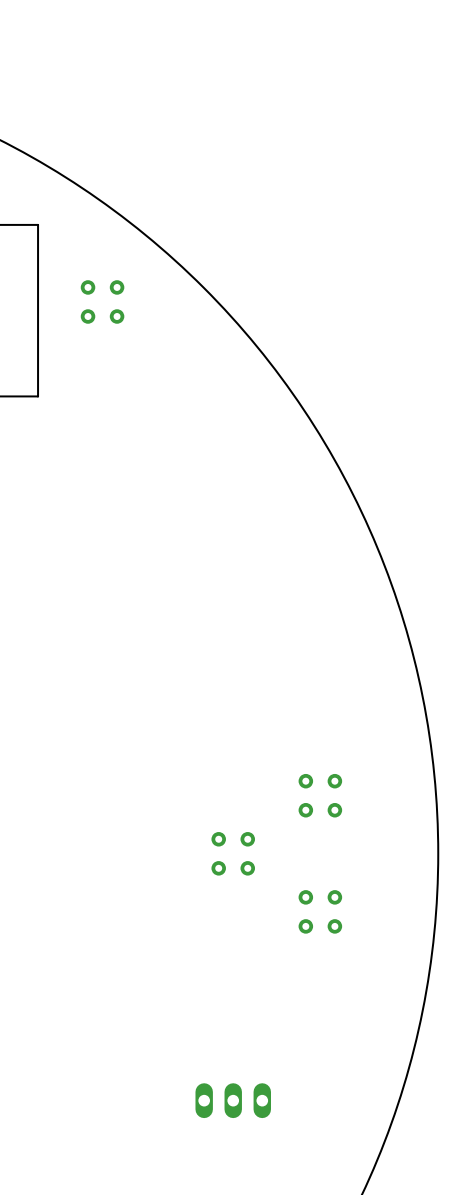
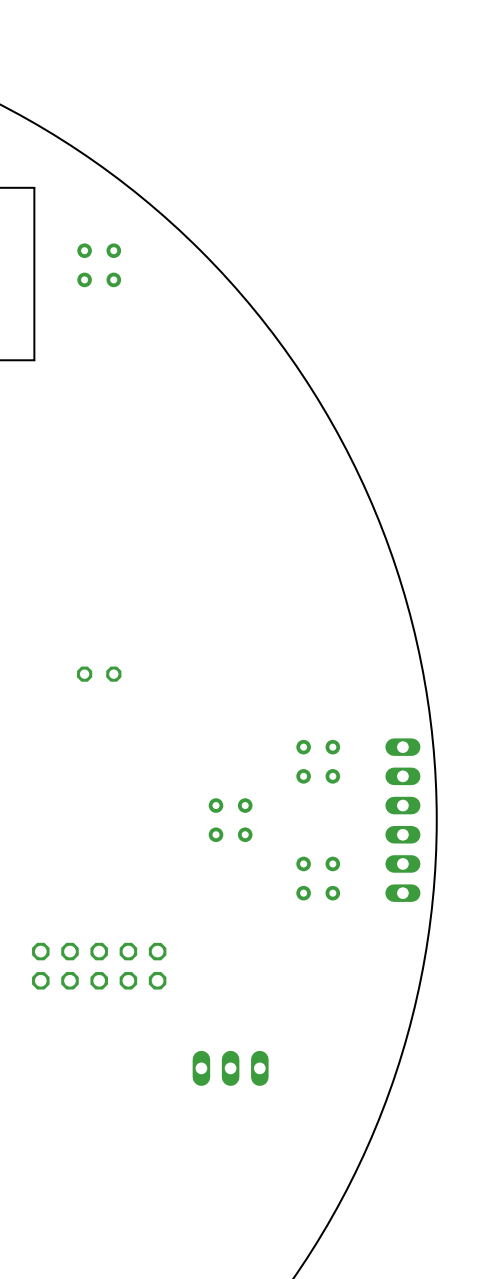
part: none -> (99, 674)
part: none -> (402, 820)
part: none -> (99, 966)

